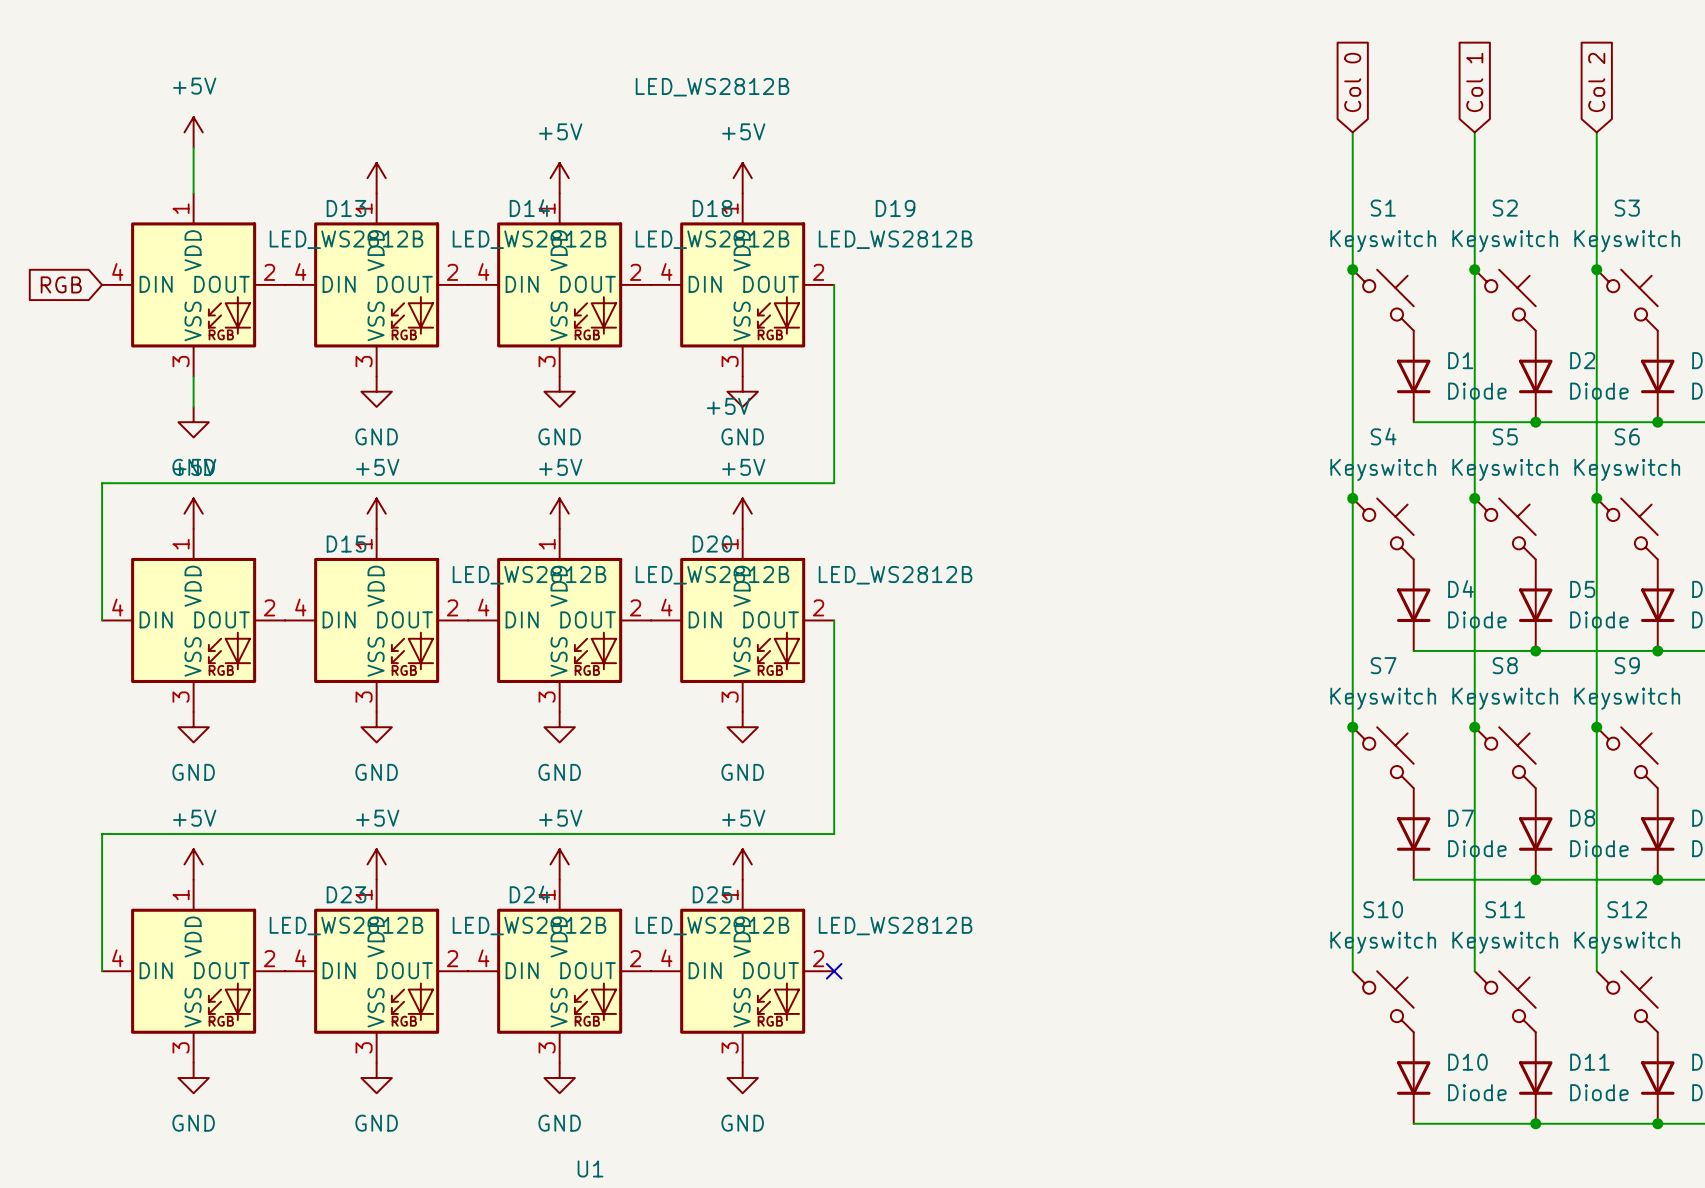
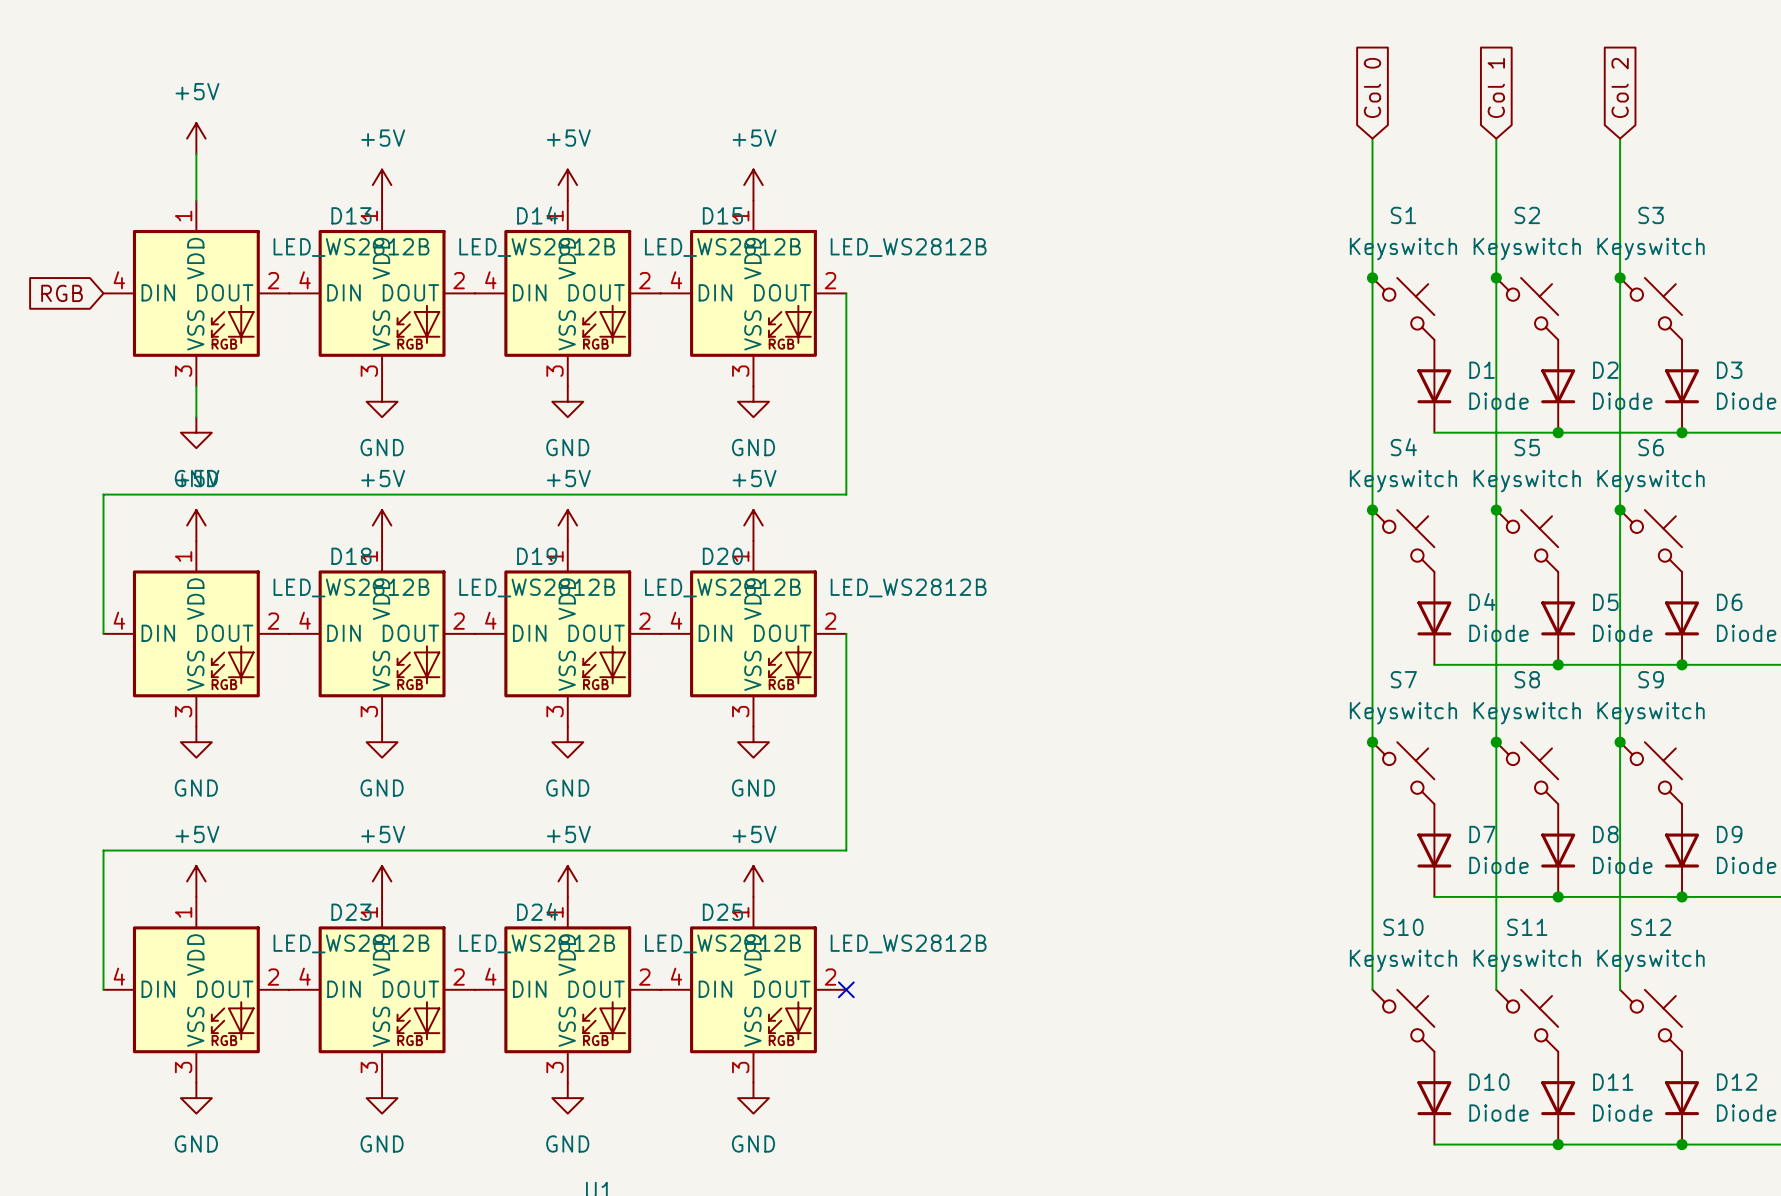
D15 value position: LED_WS2812B (712, 87) -> LED_WS2812B (722, 247)
D18 name position: D18 (712, 208) -> D18 (351, 556)
D19 name: D19 (895, 208) -> none
D18 value position: LED_WS2812B (712, 239) -> LED_WS2812B (351, 587)
power symbol text position: +5V (728, 406) -> +5V (383, 138)
D15 name position: D15 (346, 544) -> D15 (722, 215)
D19 name: none -> D19 (537, 556)

